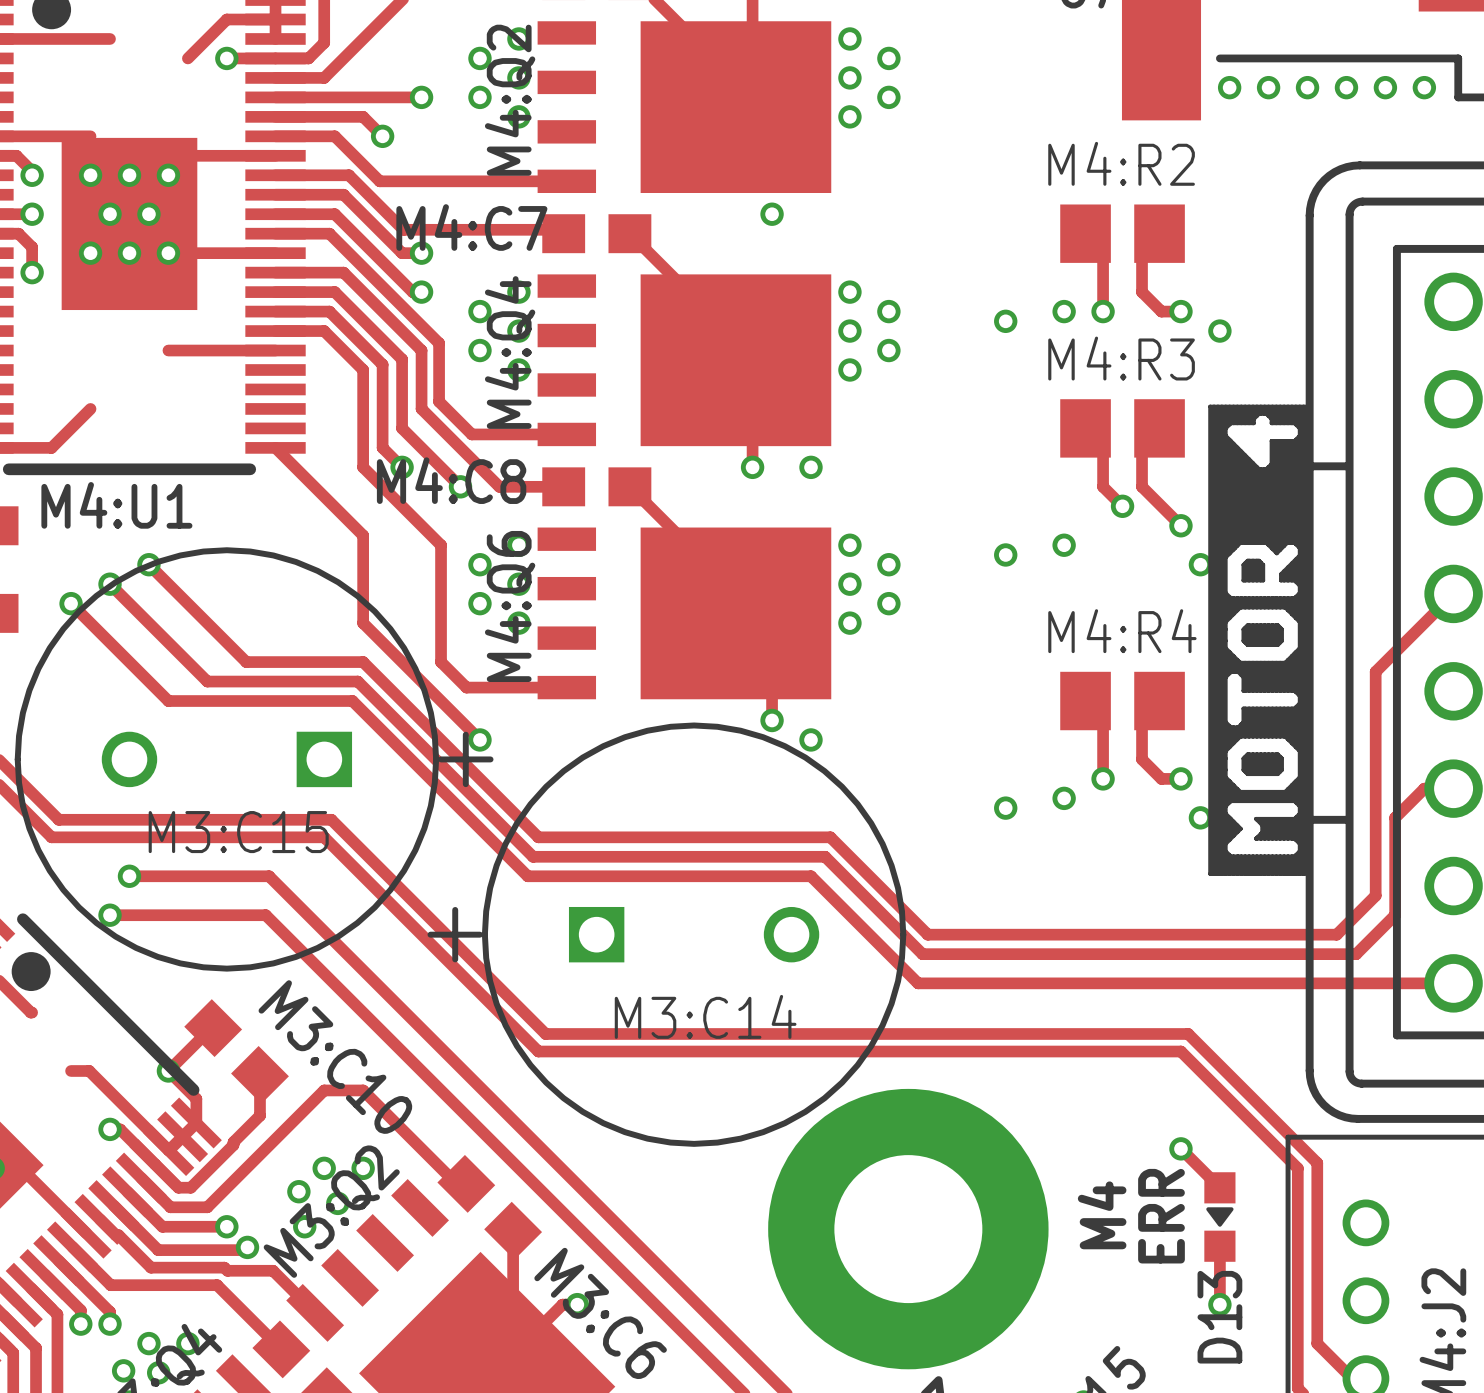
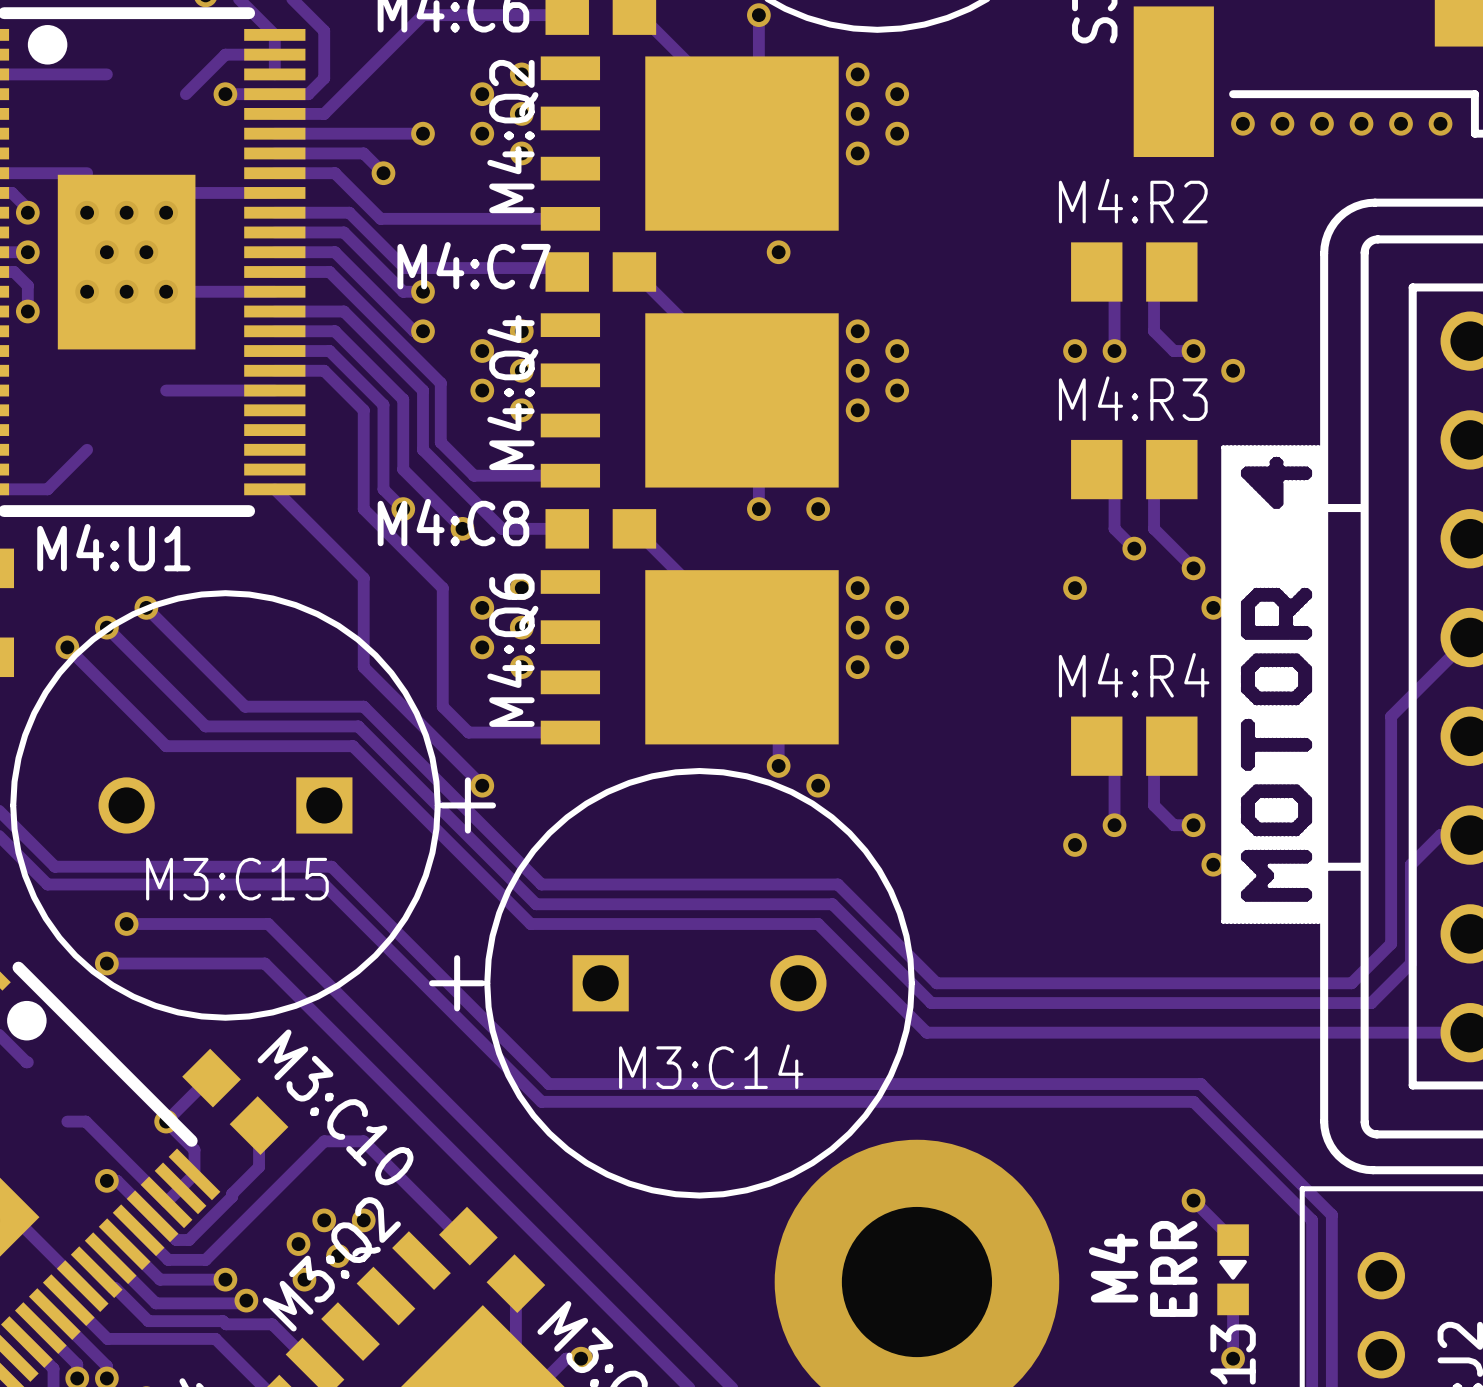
via: (1005, 321) -> none
via: (1005, 554) -> none
via: (1005, 808) -> none

